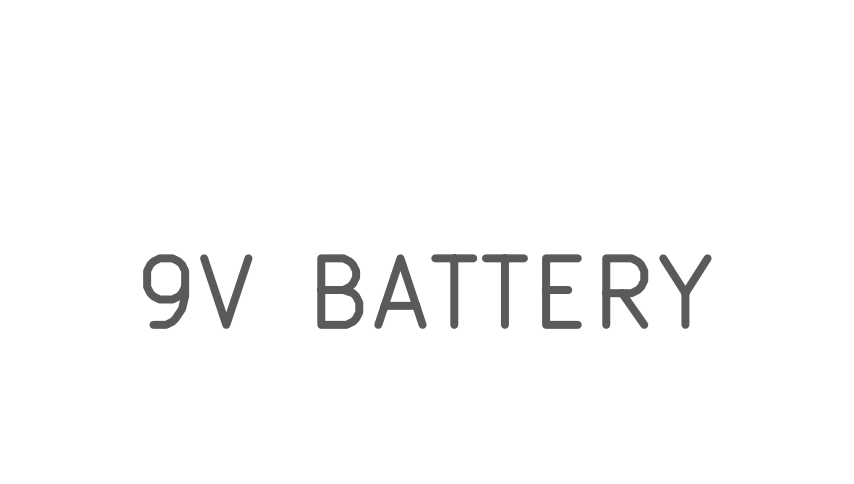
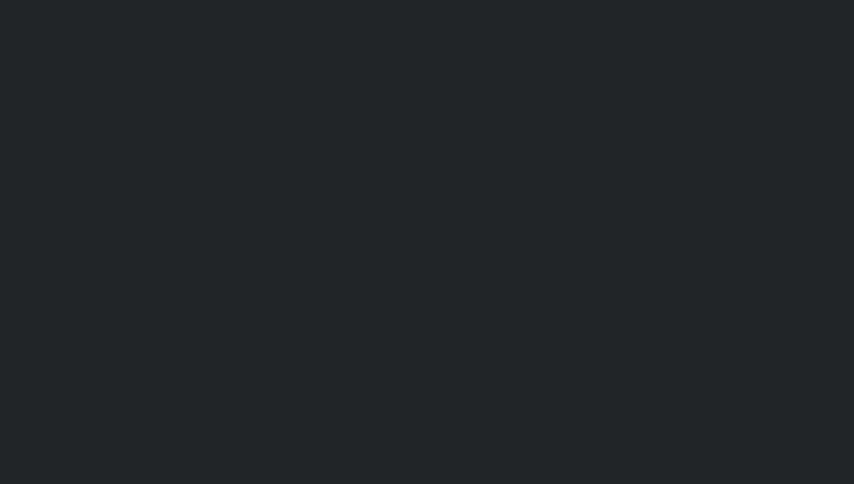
text: 9V BATTERY (427, 291) -> none

